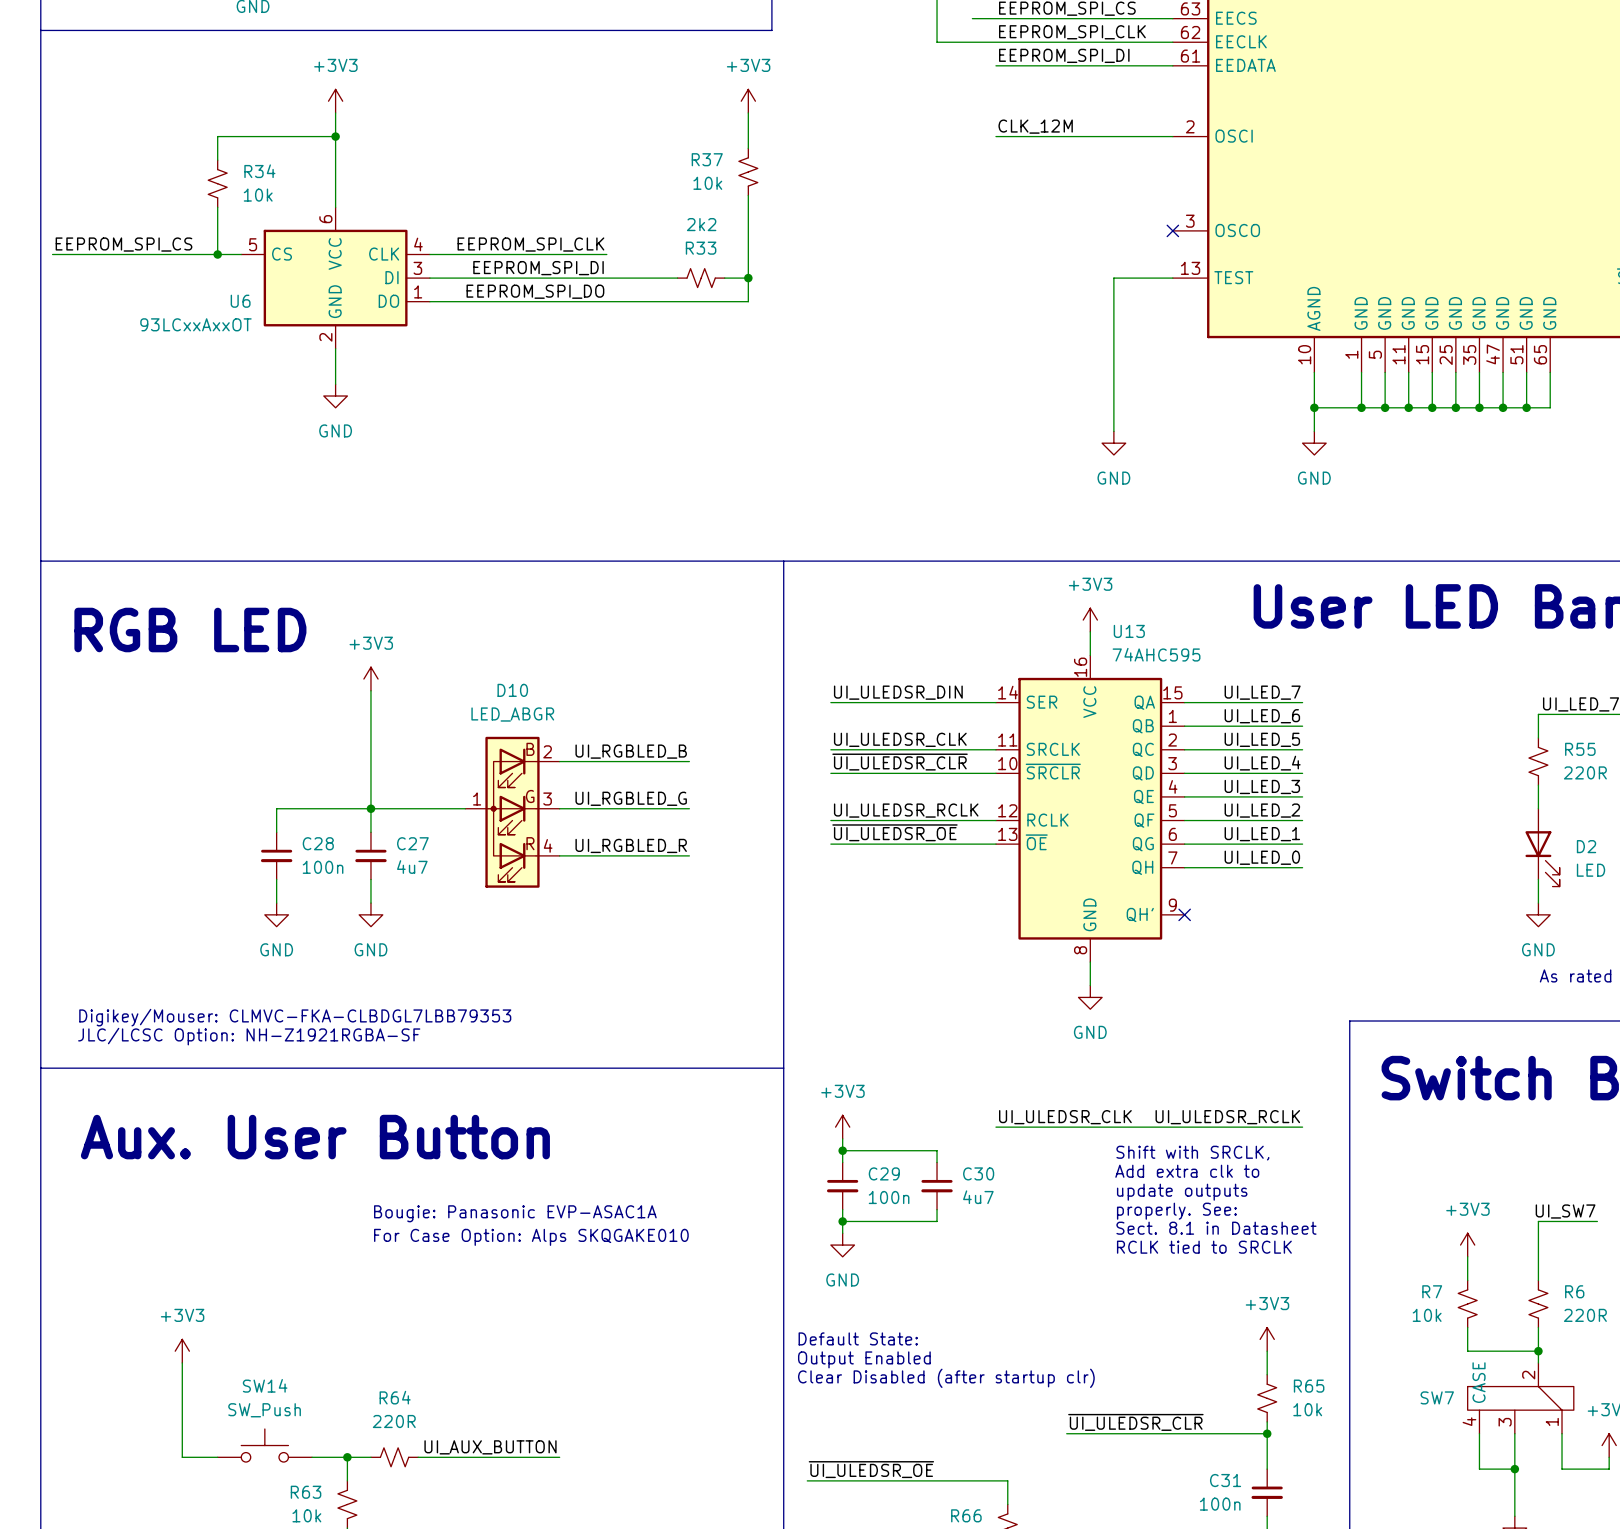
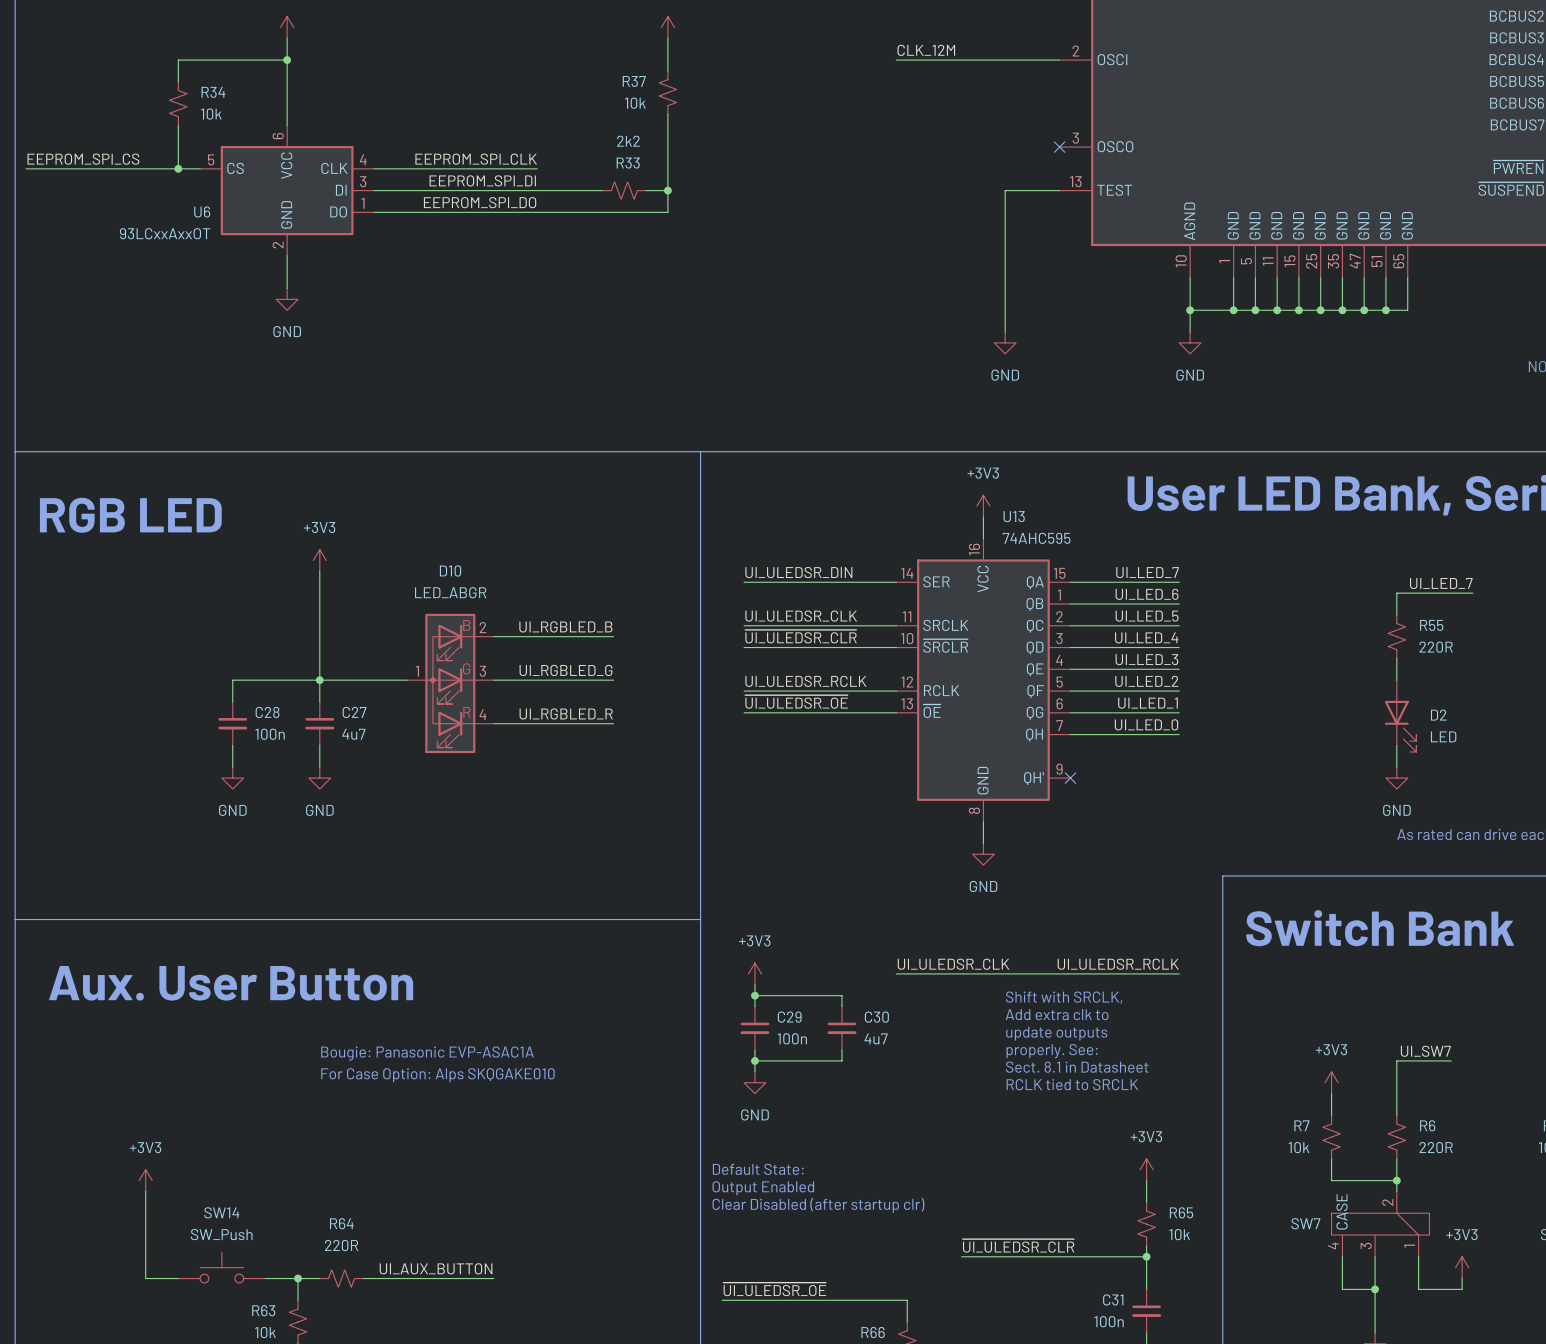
text: Digikey/Mouser: CLMVC-FKA-CLBDGL7LBB79353 (295, 1017) -> none
text: JLC/LCSC Option: NH-Z1921RGBA-SF (249, 1036) -> none

